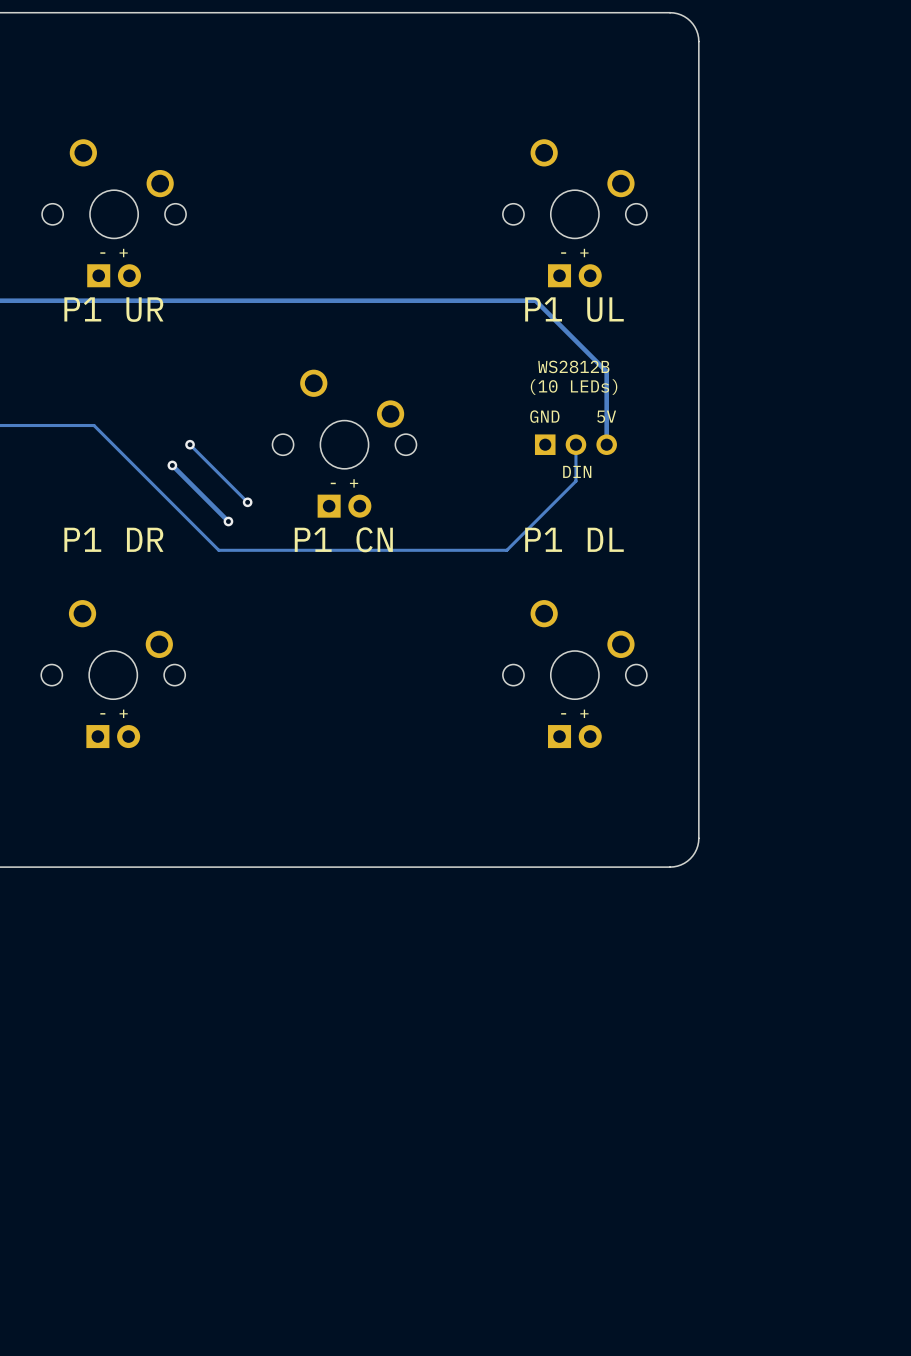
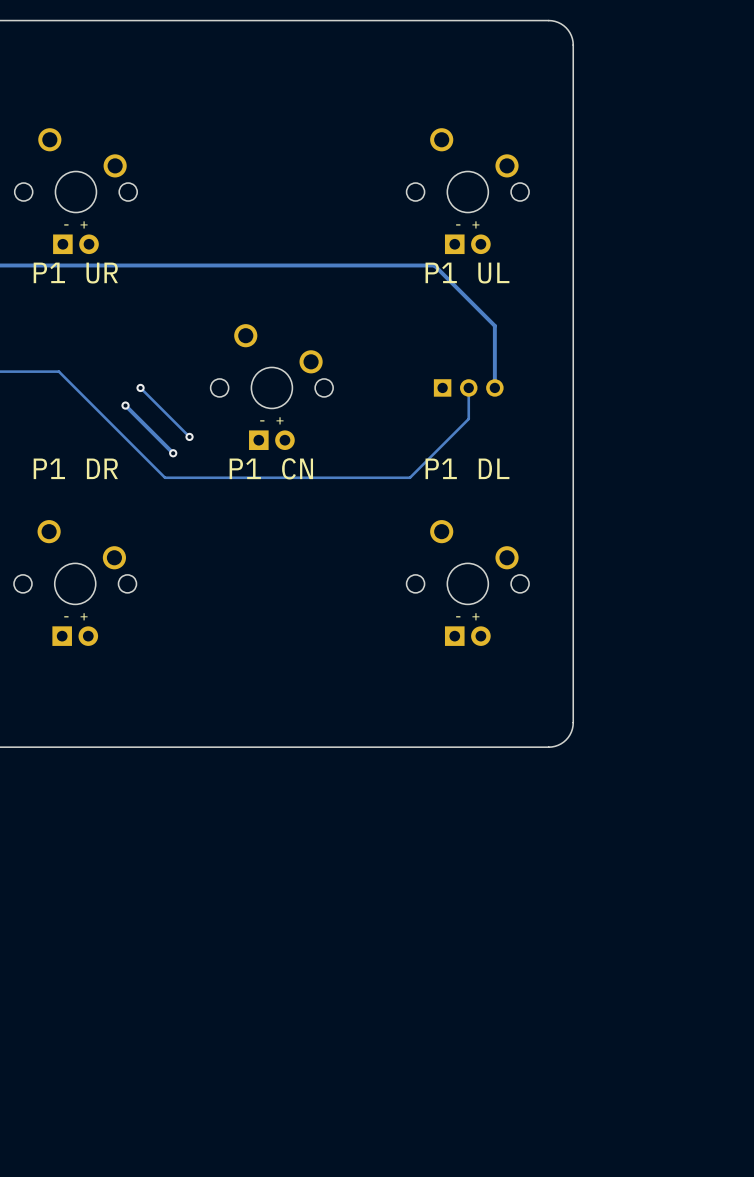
text: WS2812B (573, 366) -> none
text: (10 LEDs) (574, 387) -> none
text: GND (544, 416) -> none
text: 5V (606, 416) -> none
text: DIN (577, 471) -> none

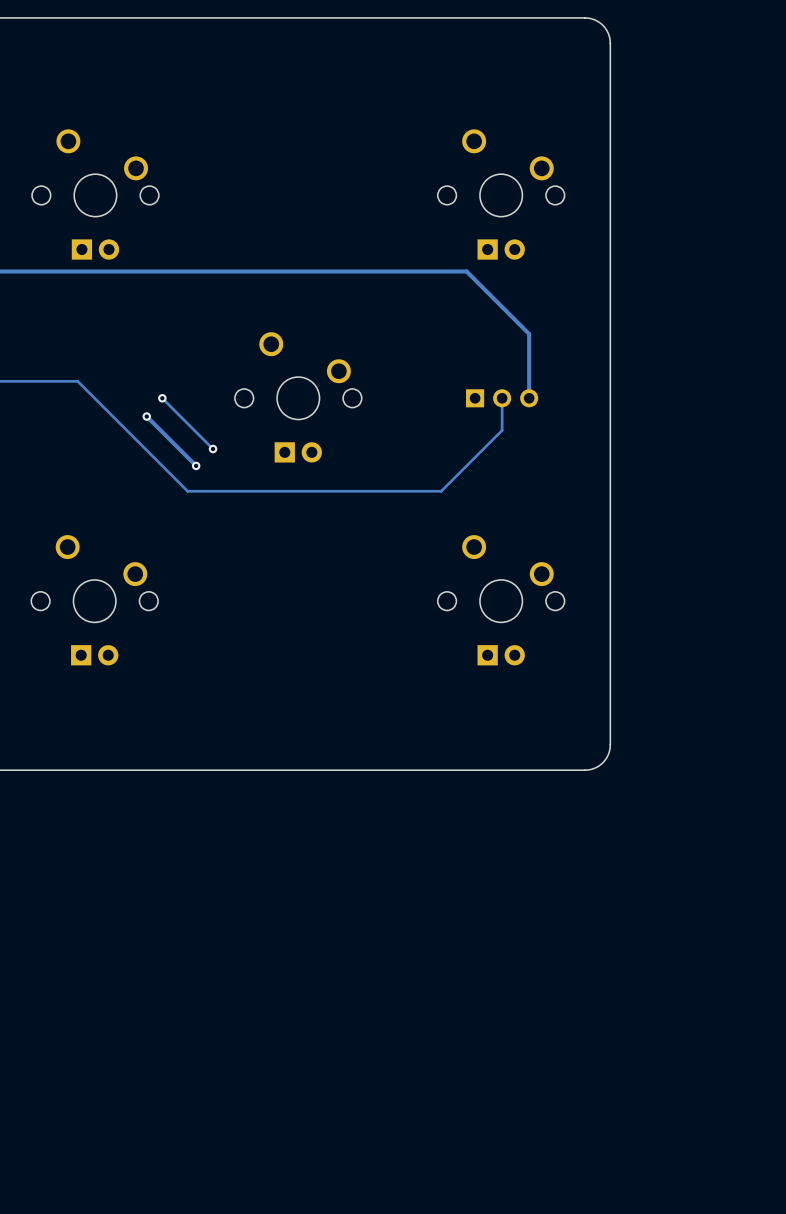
text: - + (75, 224) -> none
text: - + (467, 224) -> none
text: P1 UR (75, 273) -> none
text: P1 UL (467, 273) -> none
text: - + (271, 420) -> none
text: P1 DR (75, 468) -> none
text: P1 CN (271, 468) -> none
text: P1 DL (467, 468) -> none
text: - + (75, 616) -> none
text: - + (467, 616) -> none

